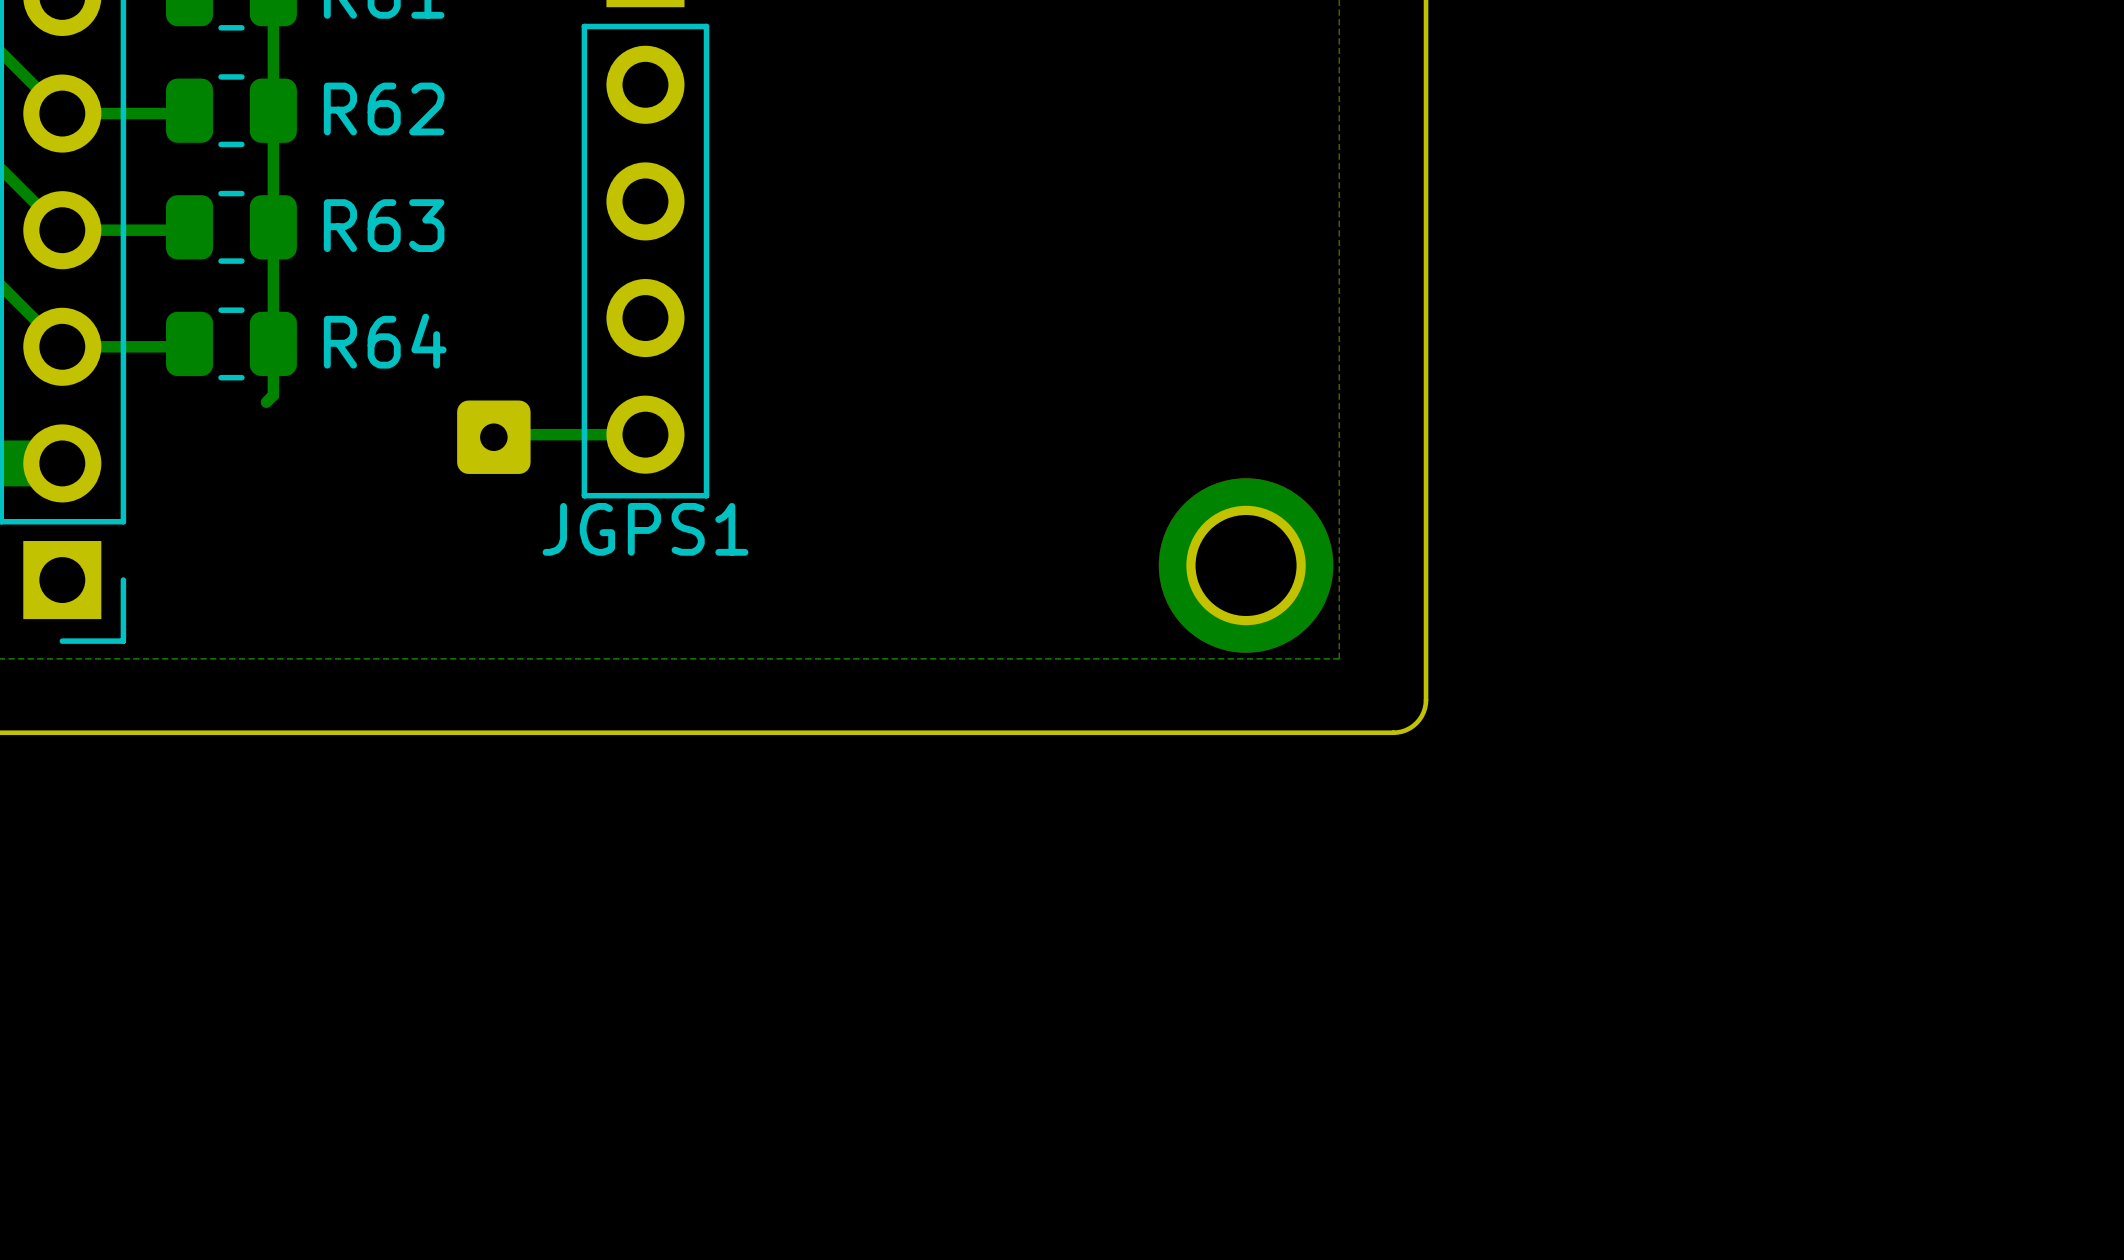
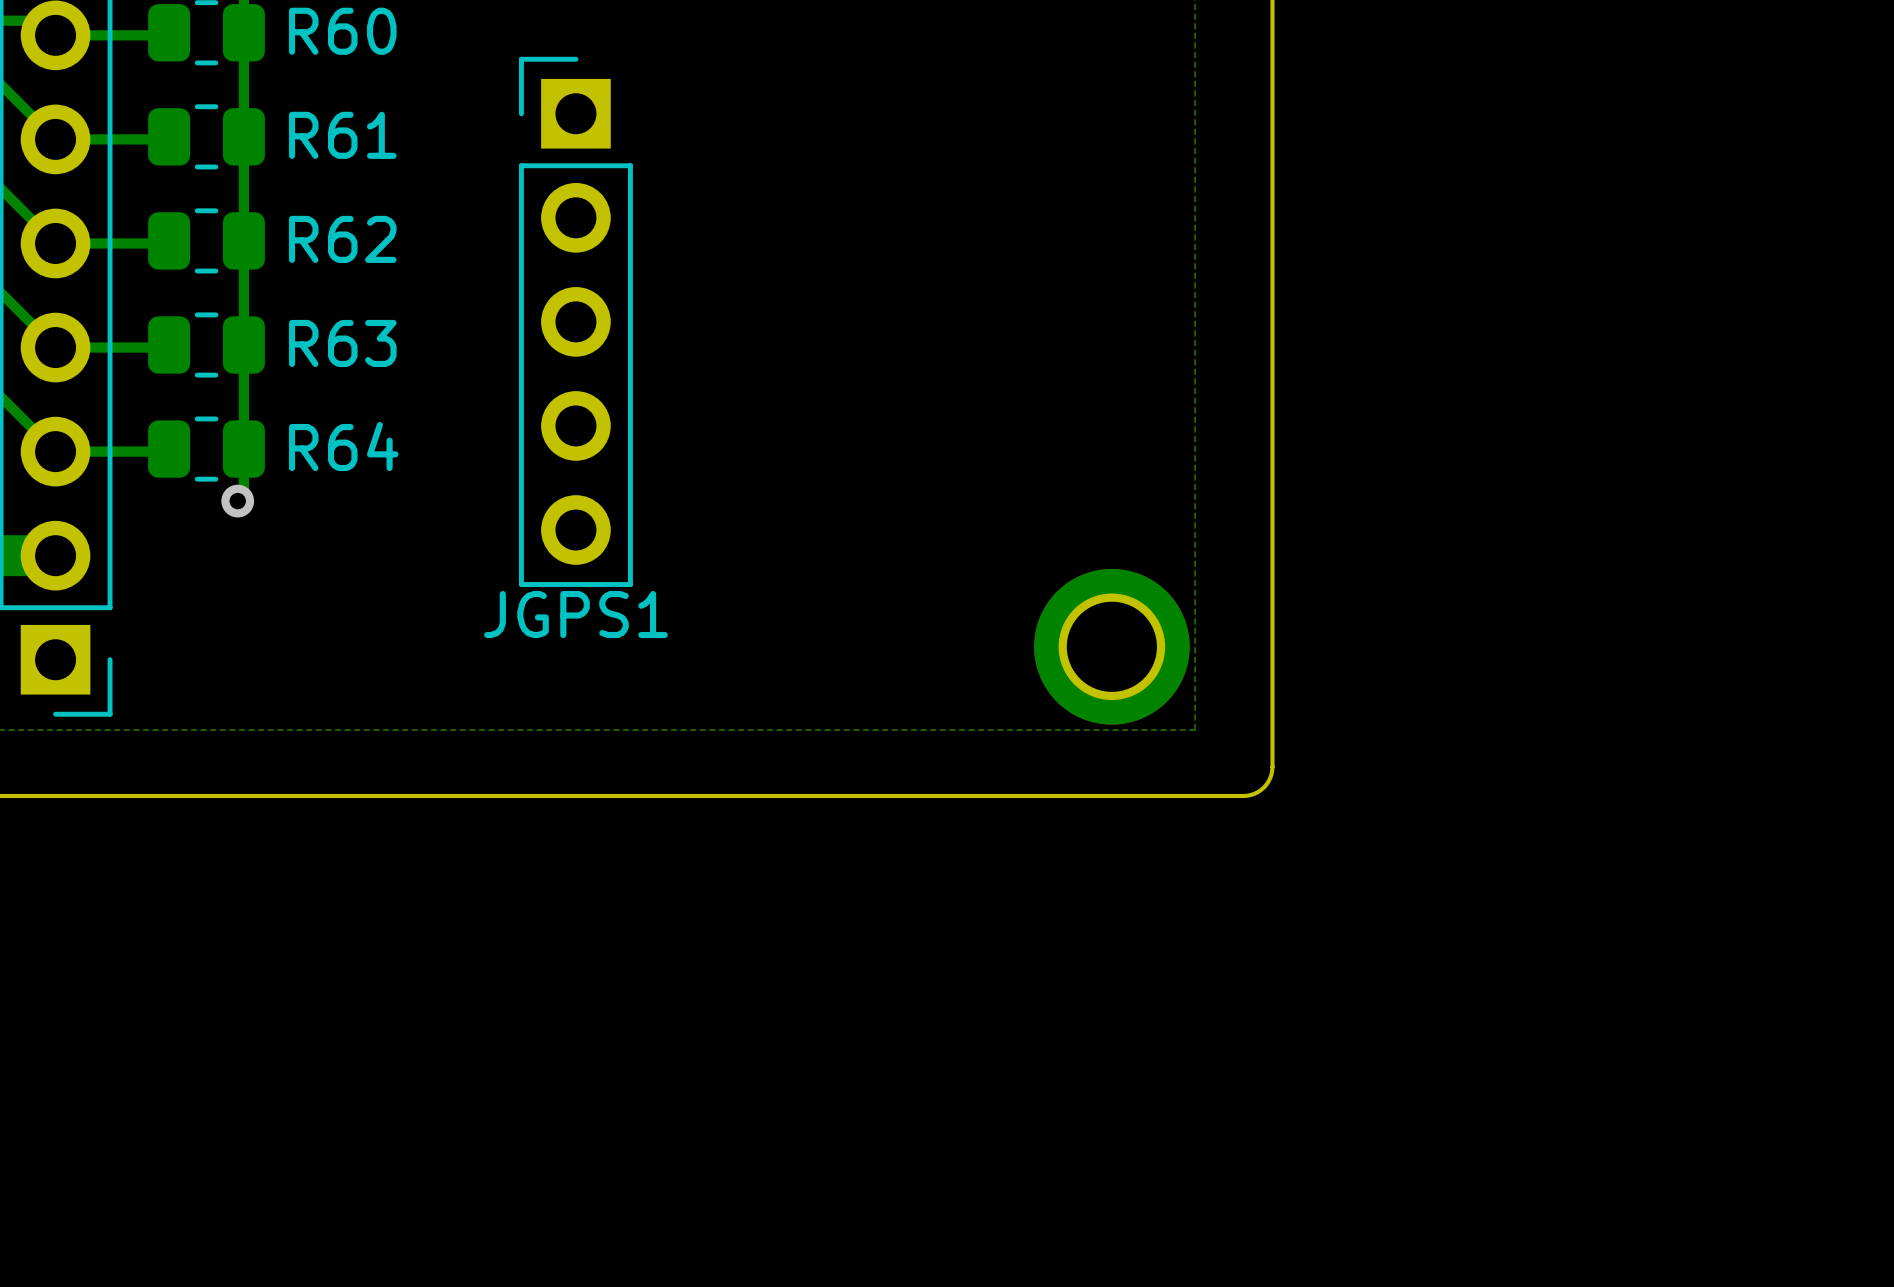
via: none -> (237, 501)
bottom track: (645, 434) (496, 434) (493, 437) -> none
part: (493, 437) -> none

